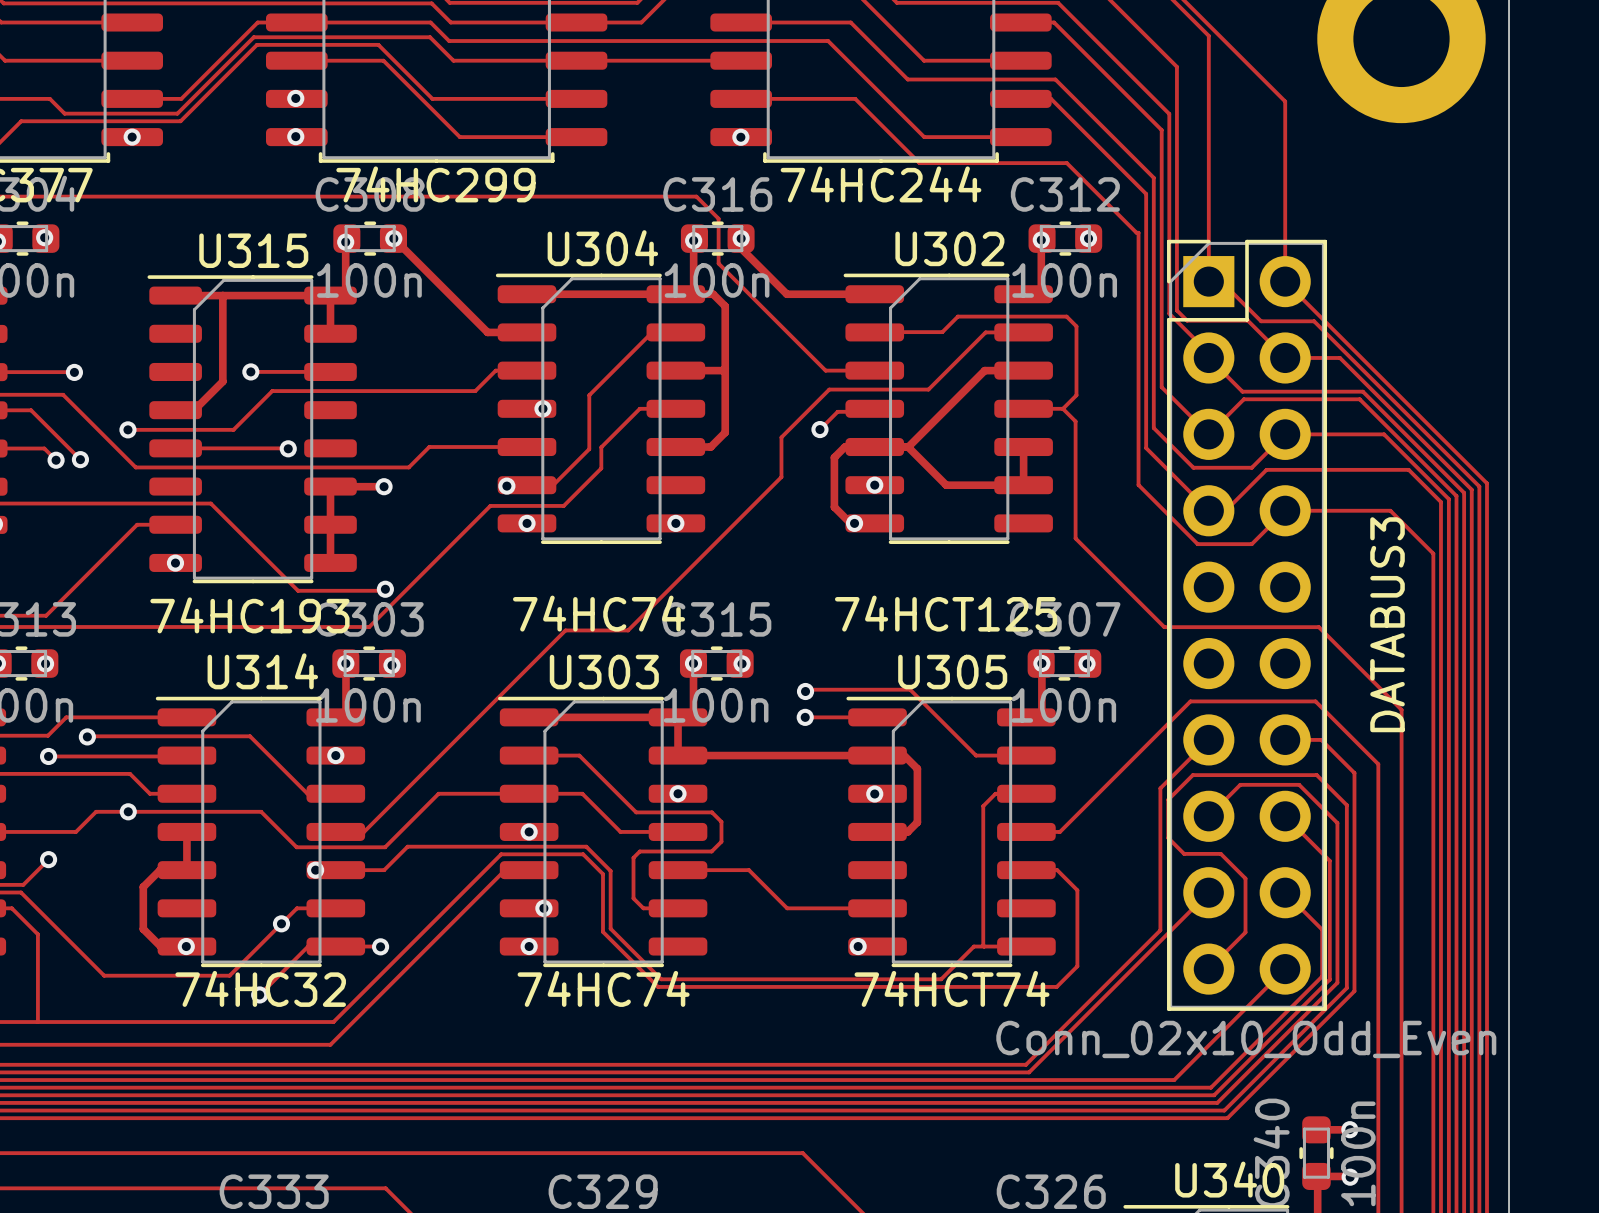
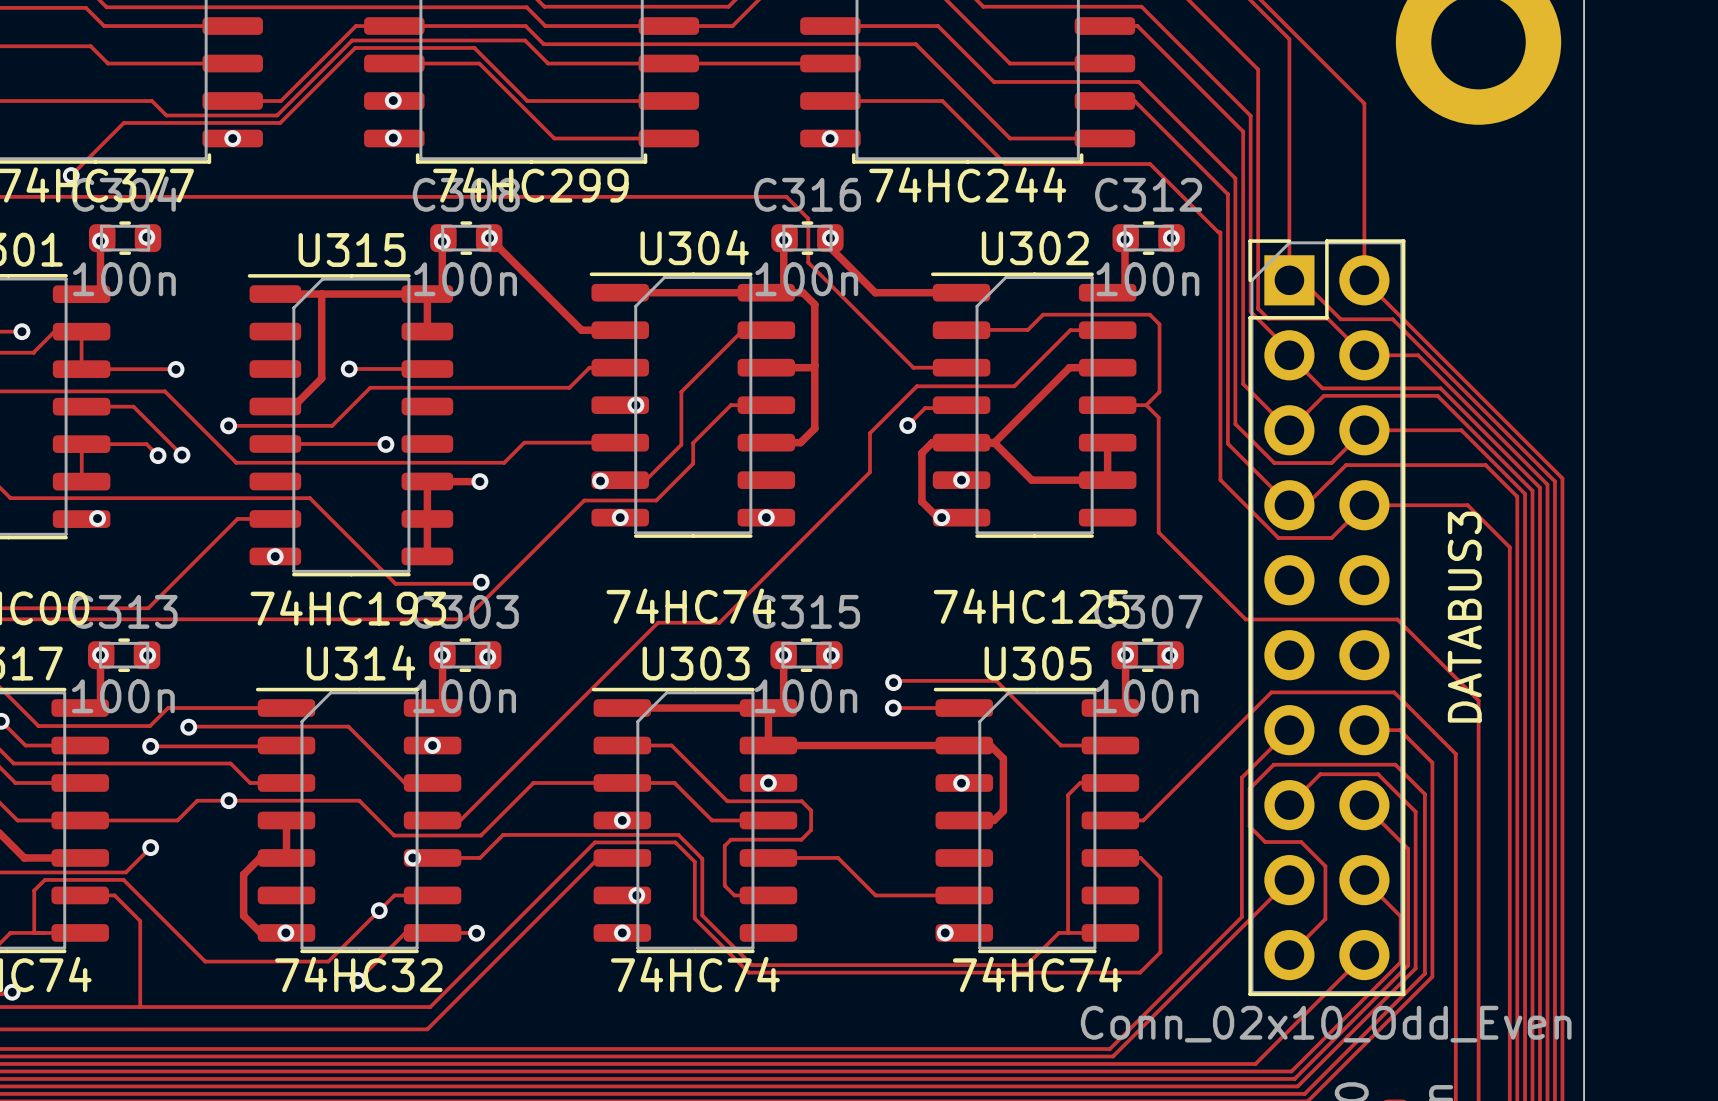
U302 value: 74HCT125 (946, 613) -> 74HC125 (1031, 606)
U305 value: 74HCT74 (951, 988) -> 74HC74 (1037, 974)

